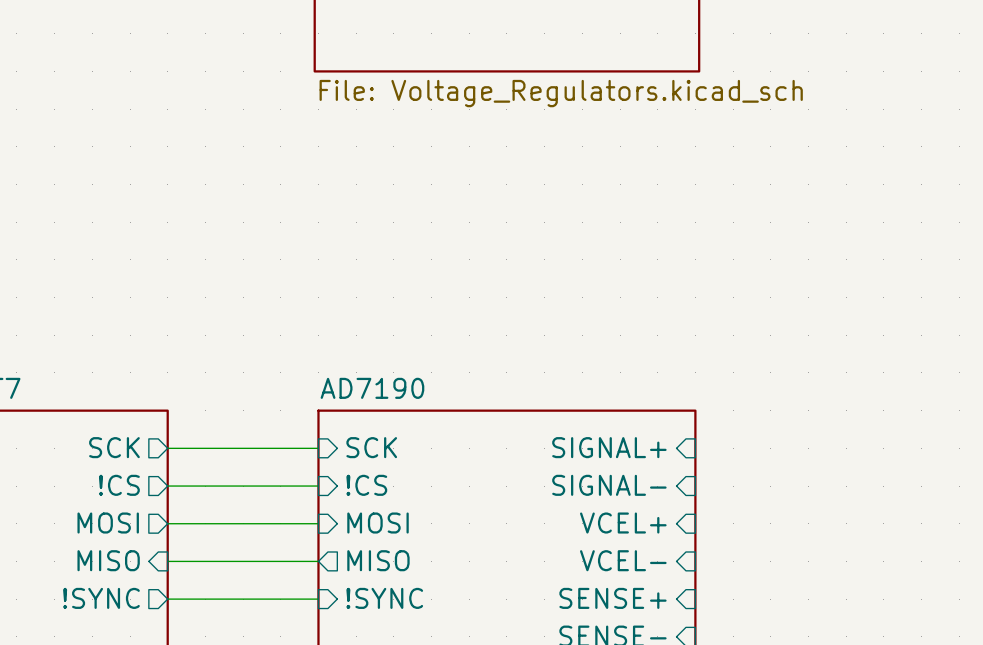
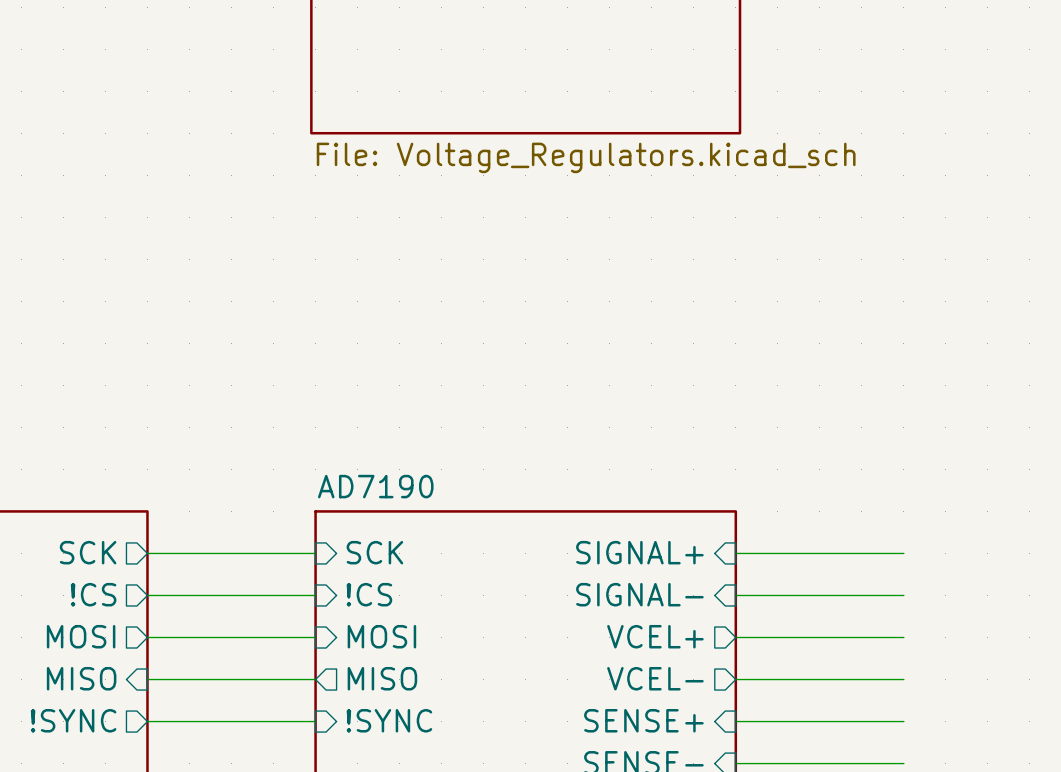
wire: none -> (735, 553) (903, 553)
wire: none -> (735, 595) (903, 595)
sheet pin shape: input (623, 523) -> output (655, 636)
wire: none -> (735, 637) (903, 637)
sheet pin shape: input (623, 560) -> output (655, 678)
wire: none -> (735, 679) (903, 679)
wire: none -> (735, 721) (903, 721)
wire: none -> (735, 763) (903, 763)

